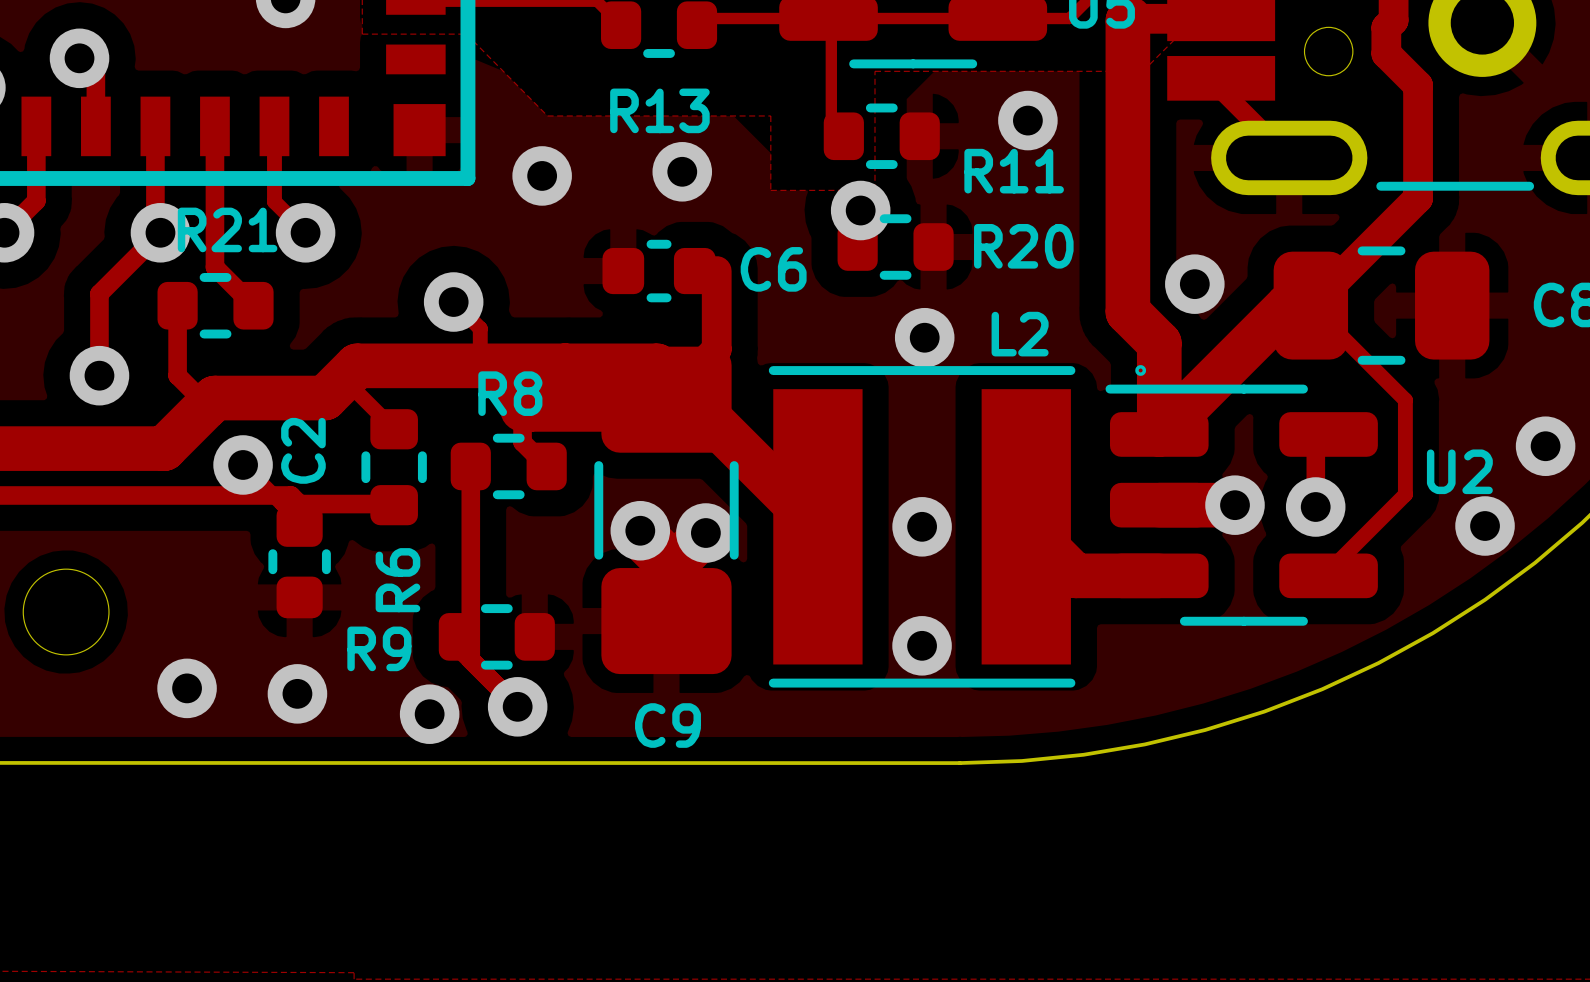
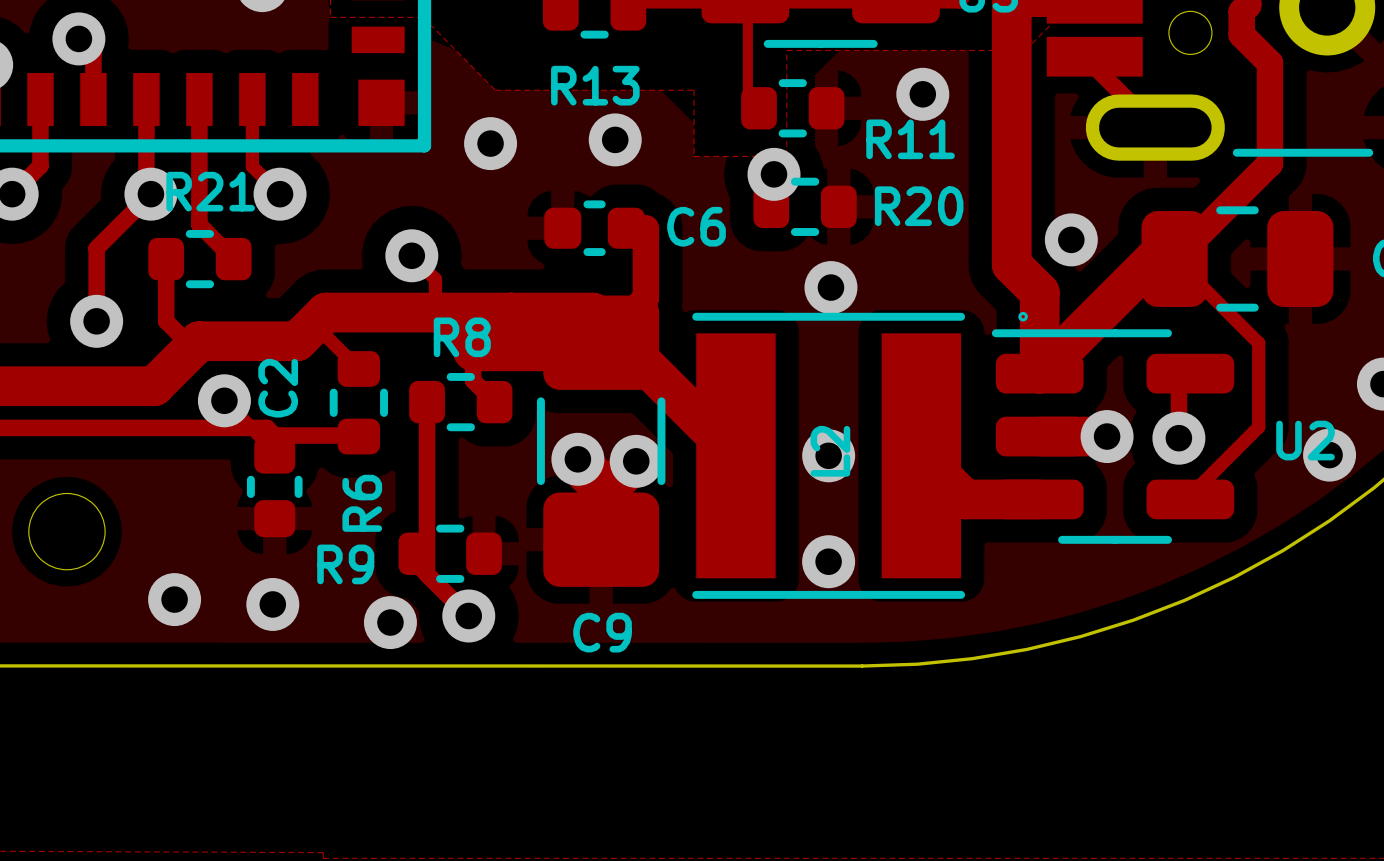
L2 name rotation: 0° (1020, 334) -> 90° counterclockwise (830, 451)
L2 name position: L2 (1020, 334) -> L2 (830, 451)
U2 name position: U2 (1459, 471) -> U2 (1305, 440)

